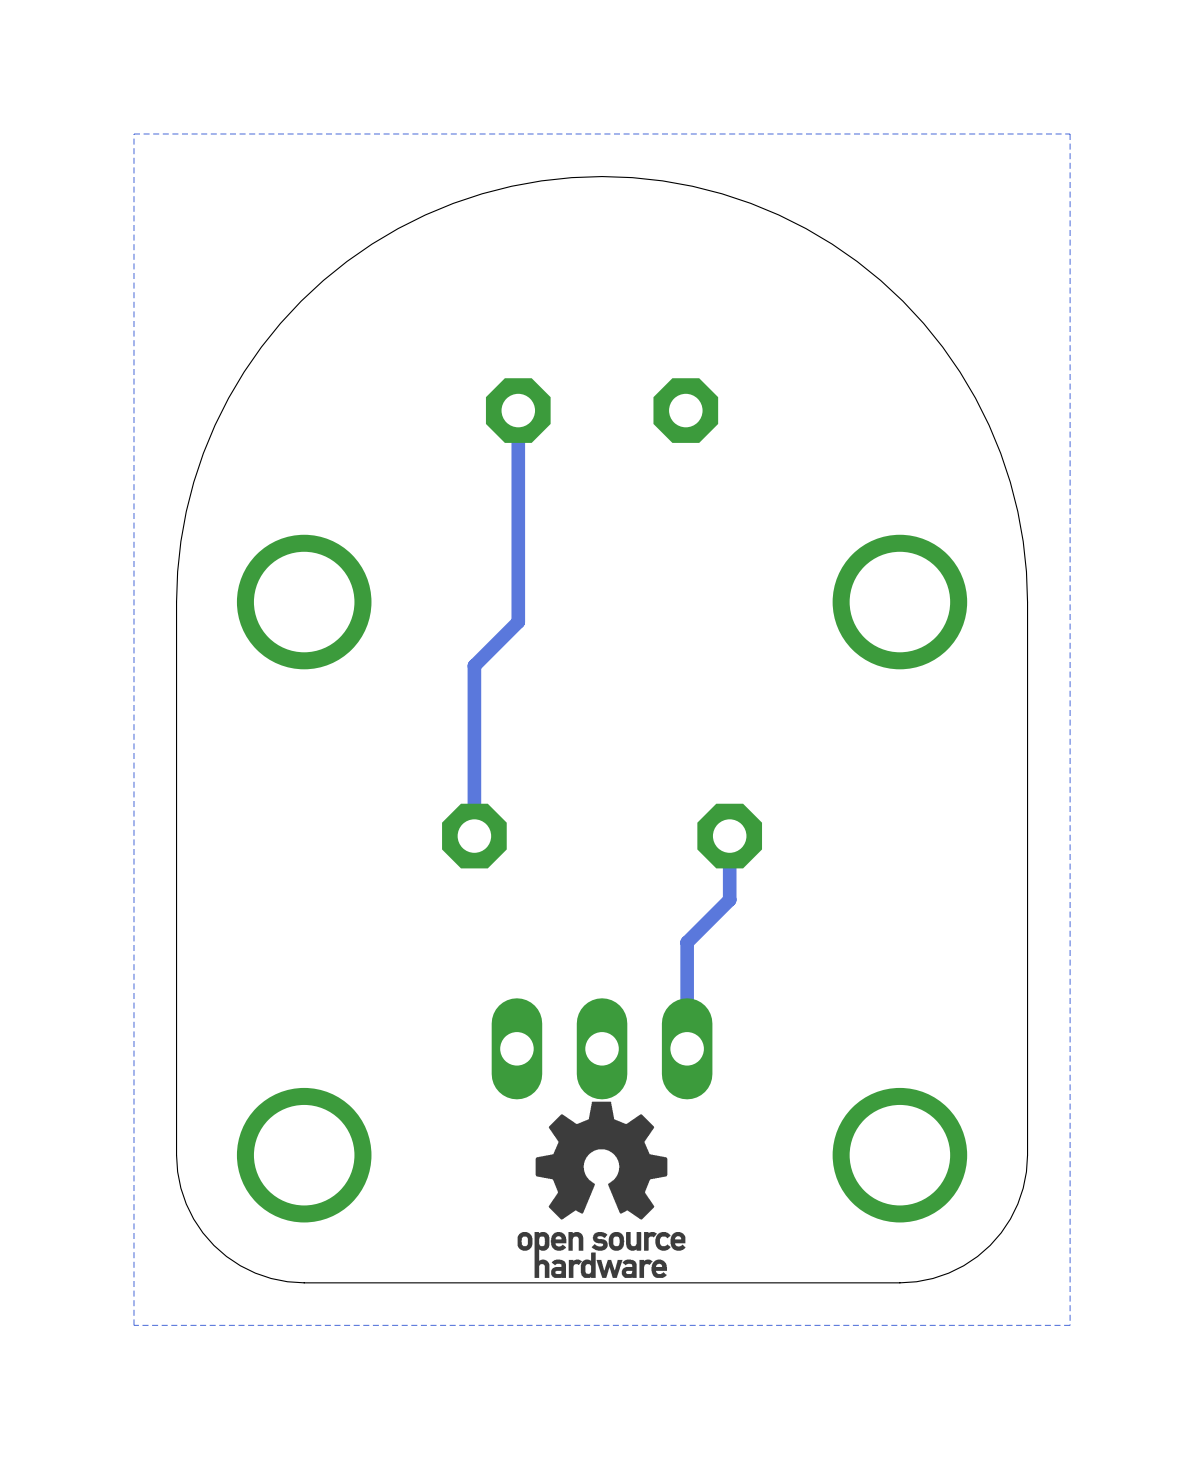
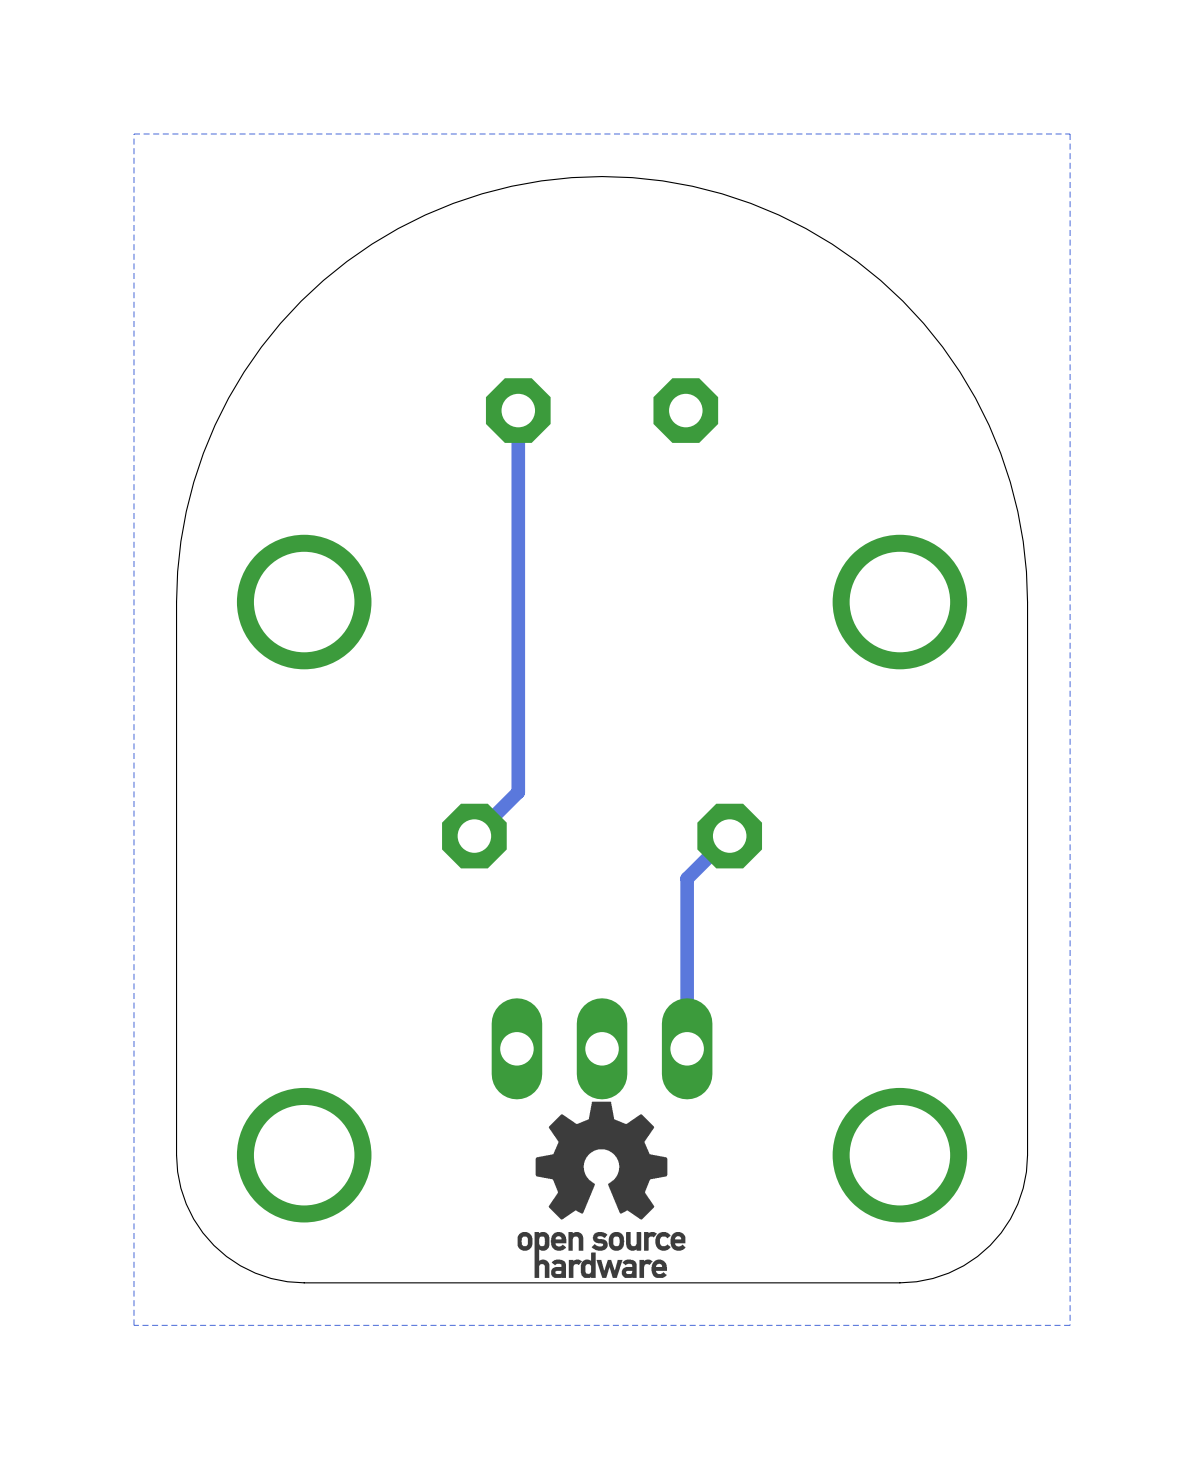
track: (518, 621) (474, 665) (474, 836) -> (518, 621) (518, 792) (474, 836)
track: (729, 836) (729, 899) (687, 942) -> (729, 836) (687, 878) (687, 942)

